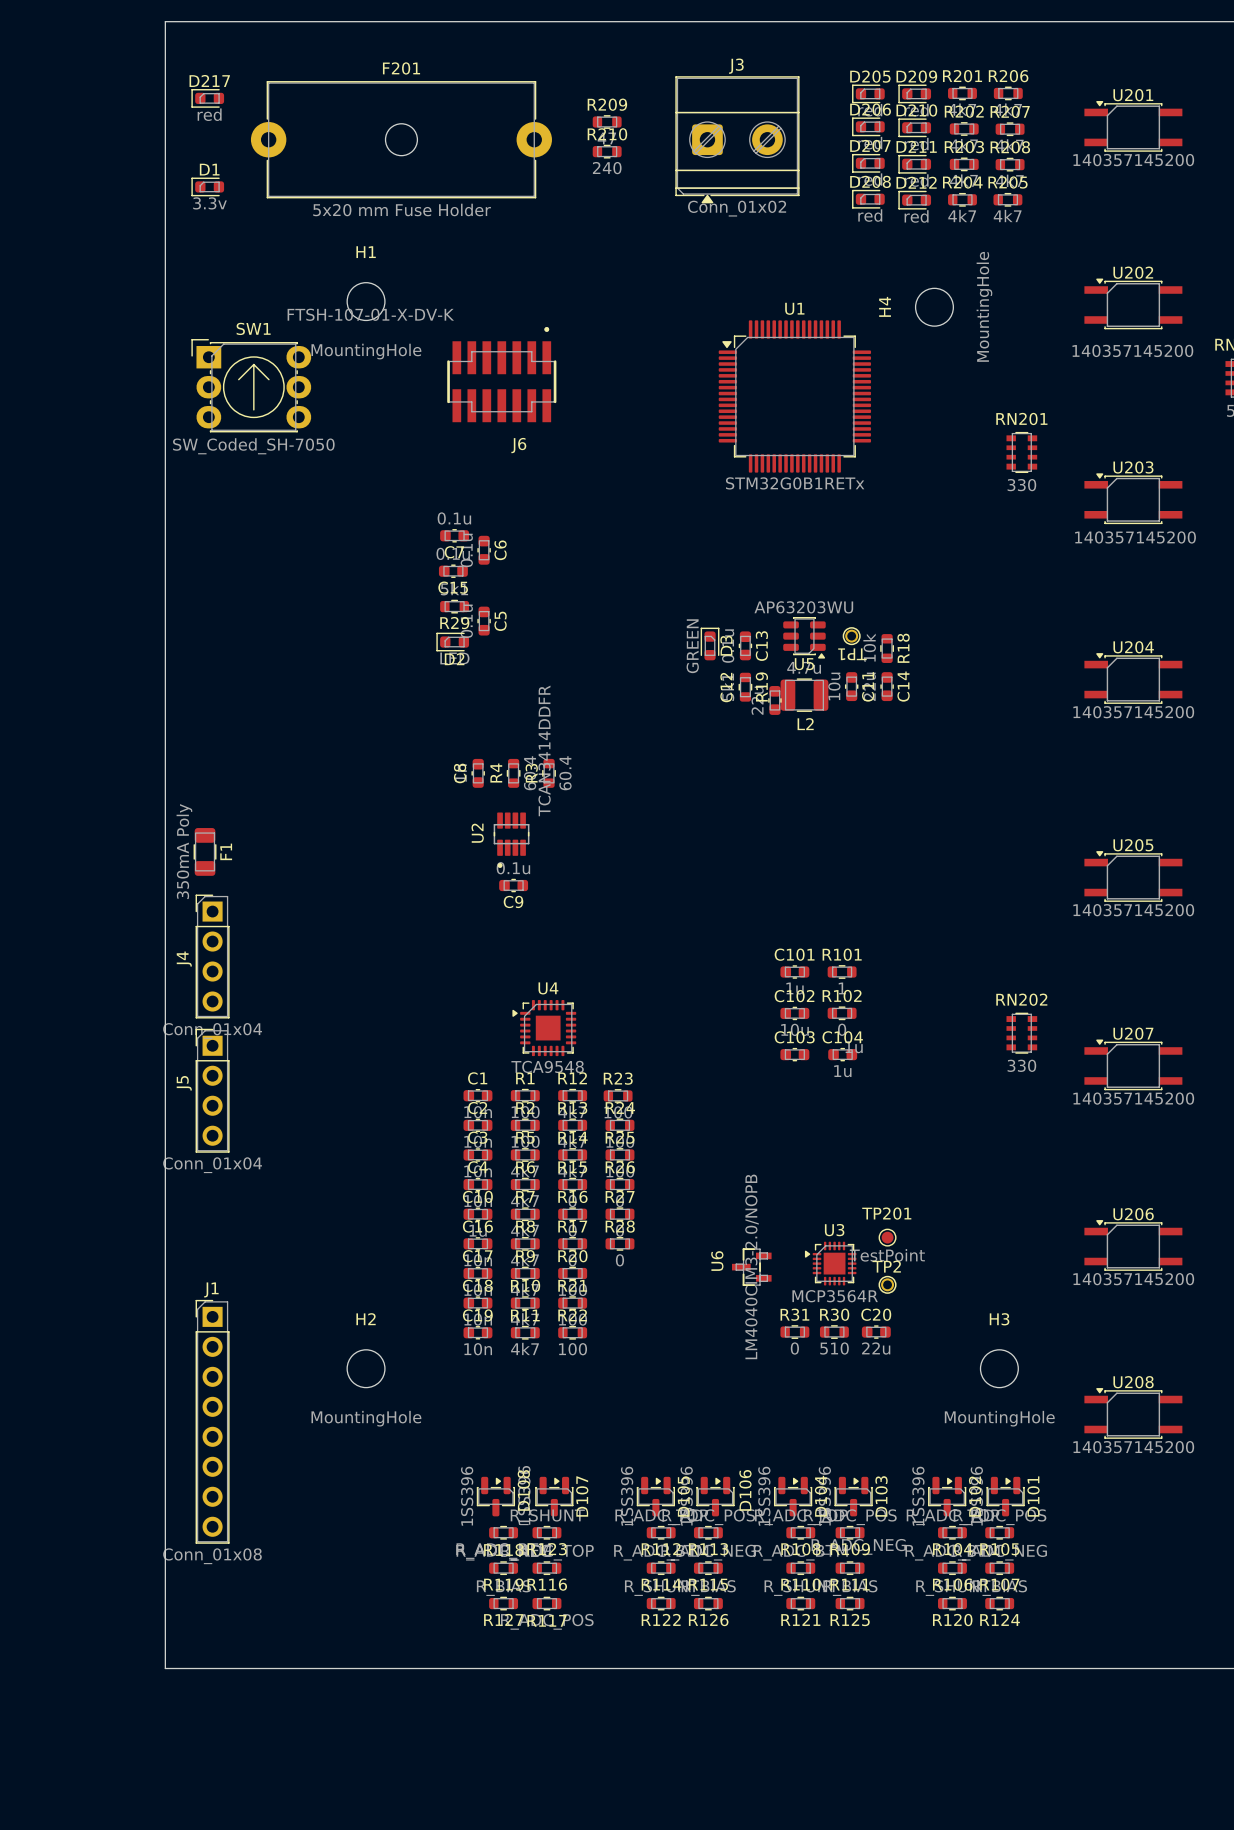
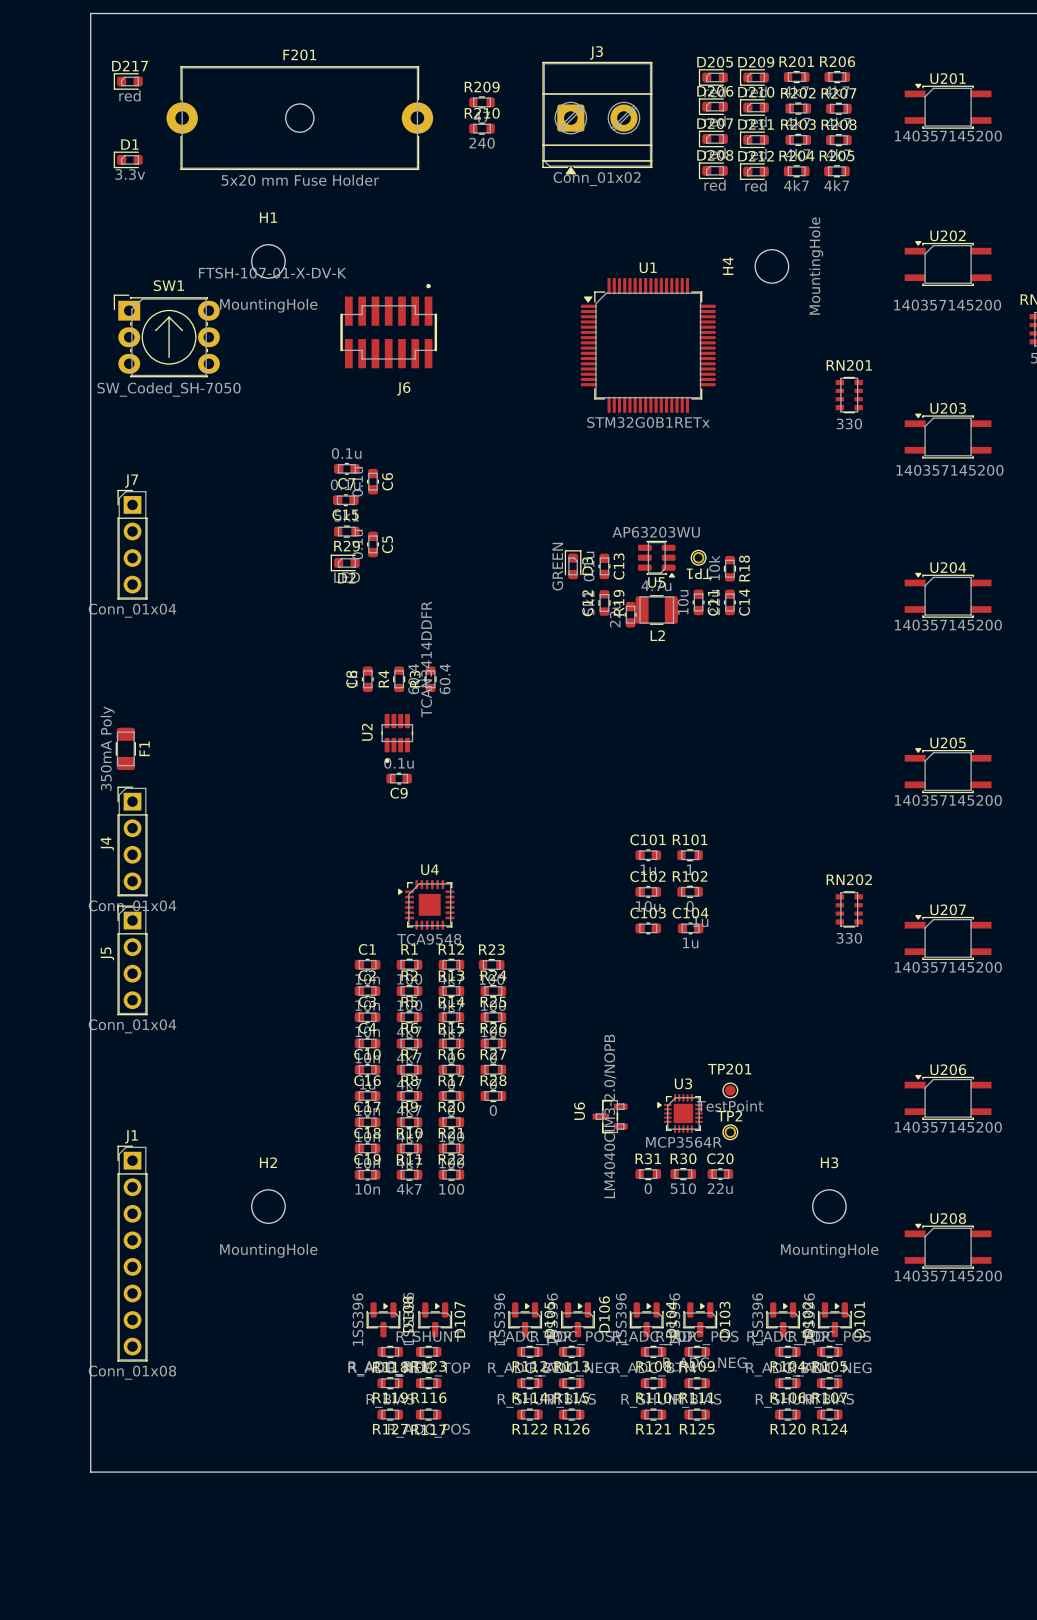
J7: none -> Conn_01x04 (132, 544)

